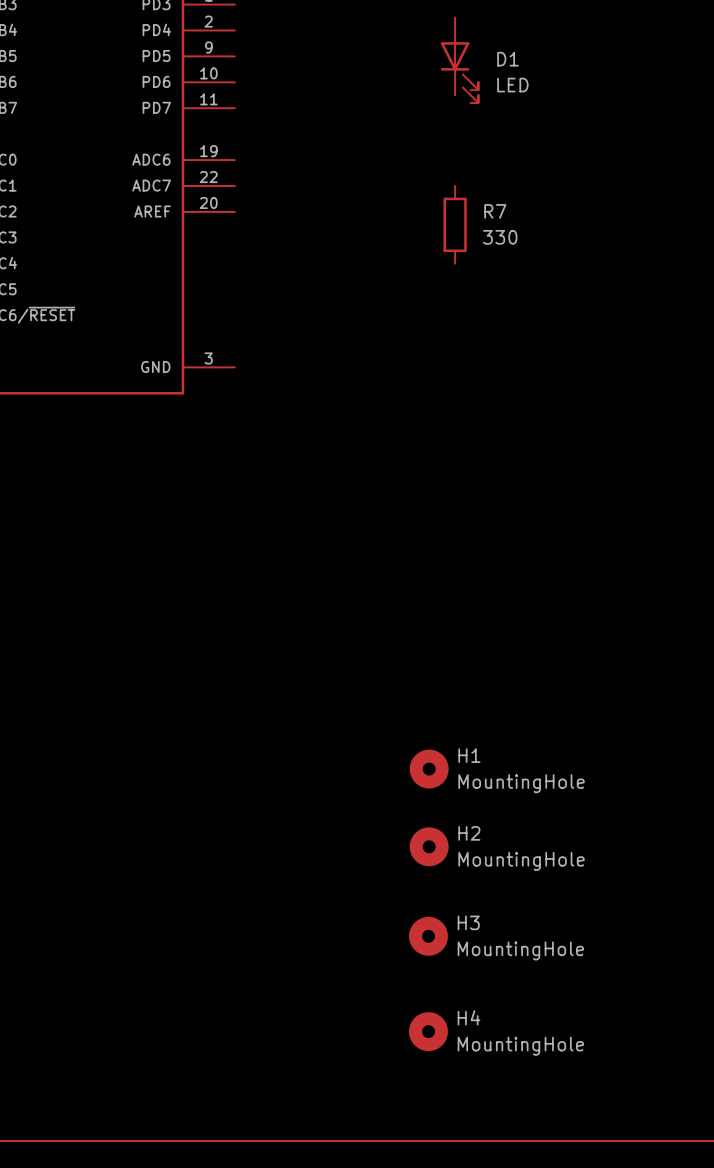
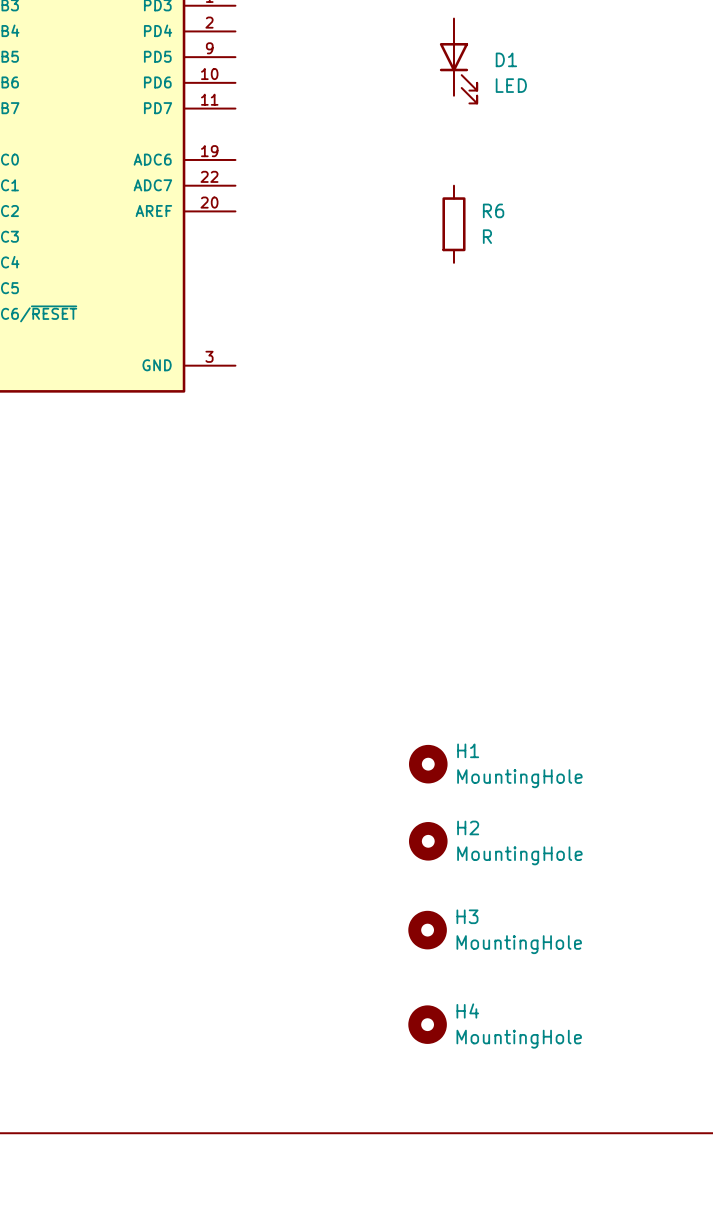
R7 name: R7 (495, 211) -> R6 (493, 210)
R7 value: 330 (500, 237) -> R (487, 236)

